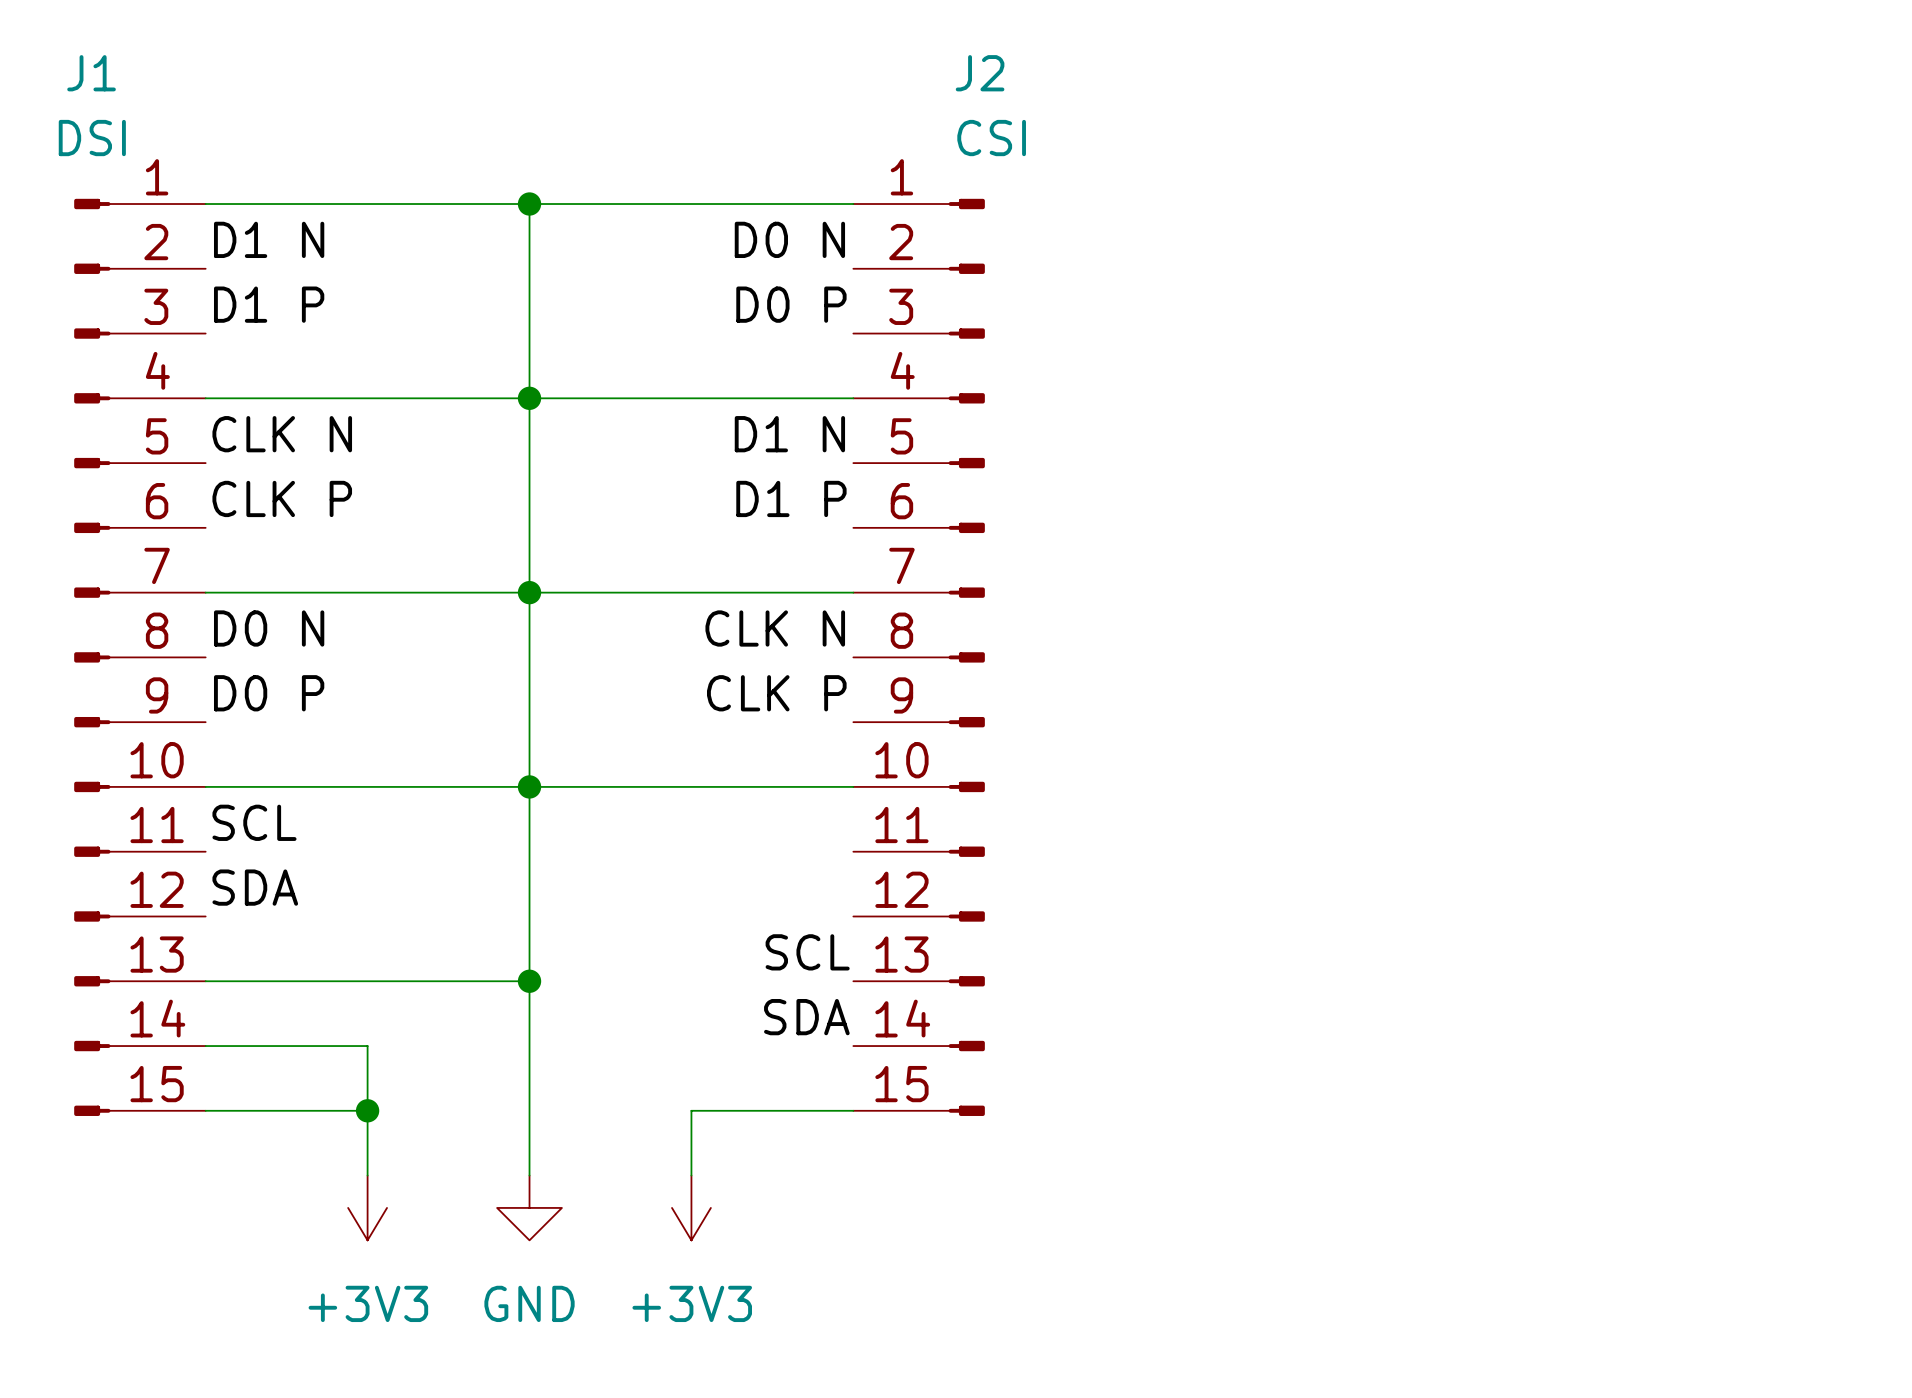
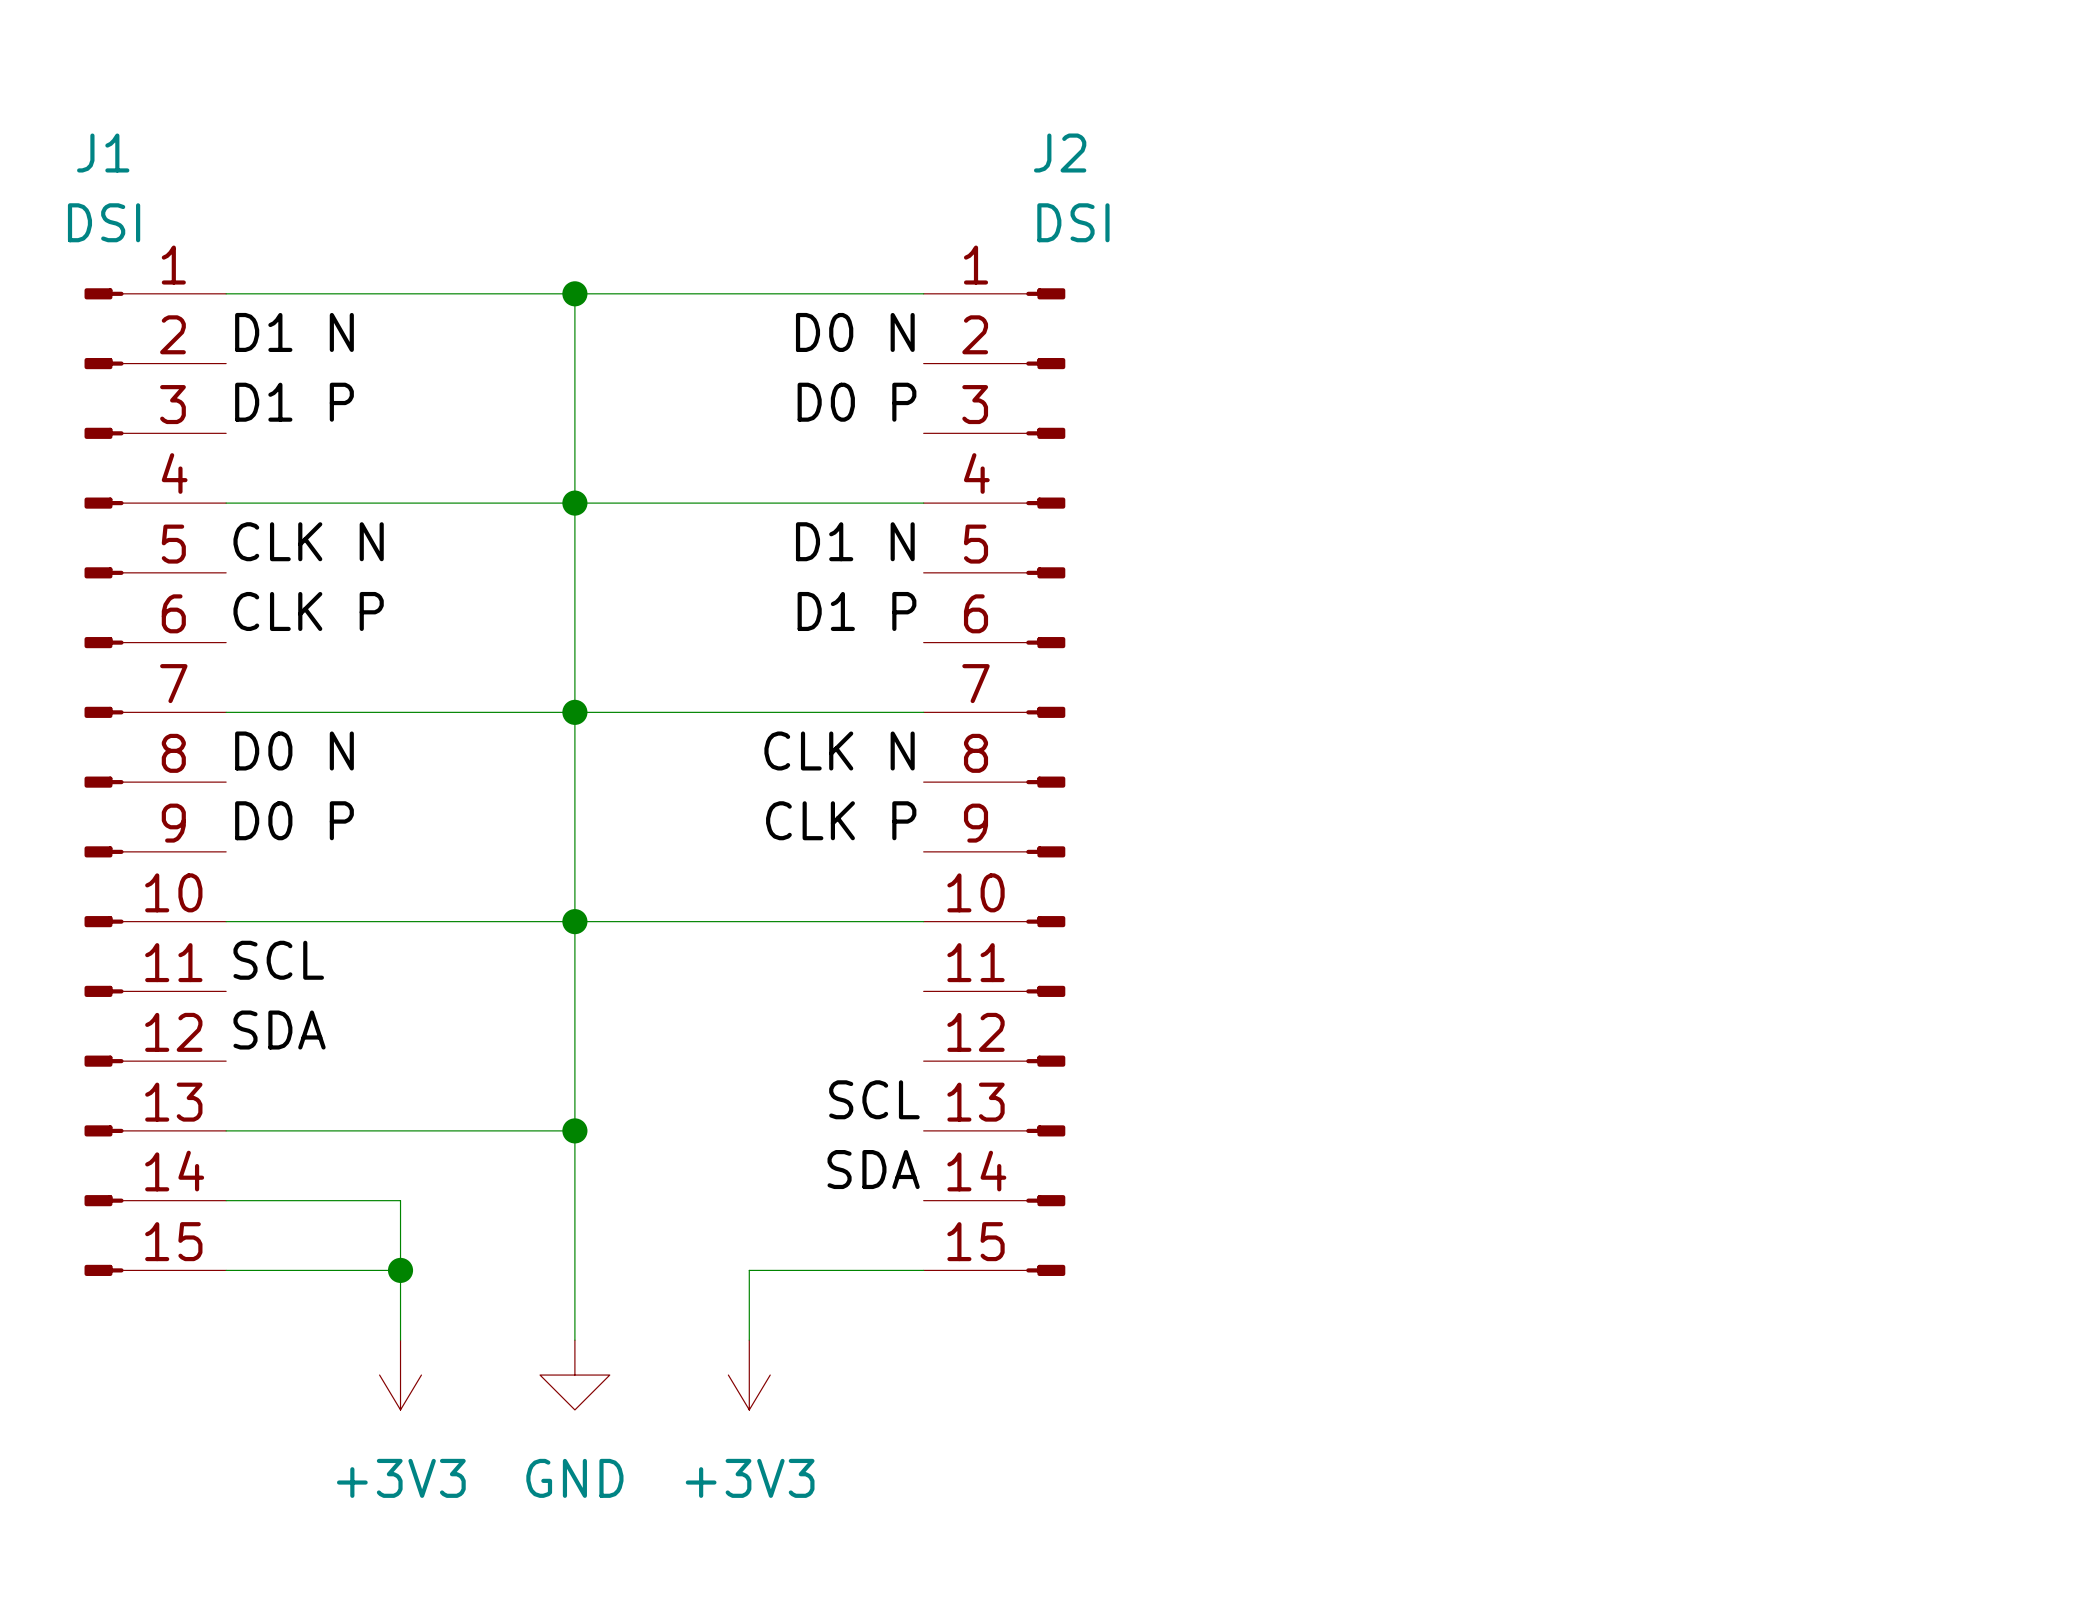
J2 value: CSI (991, 138) -> DSI (1073, 222)

